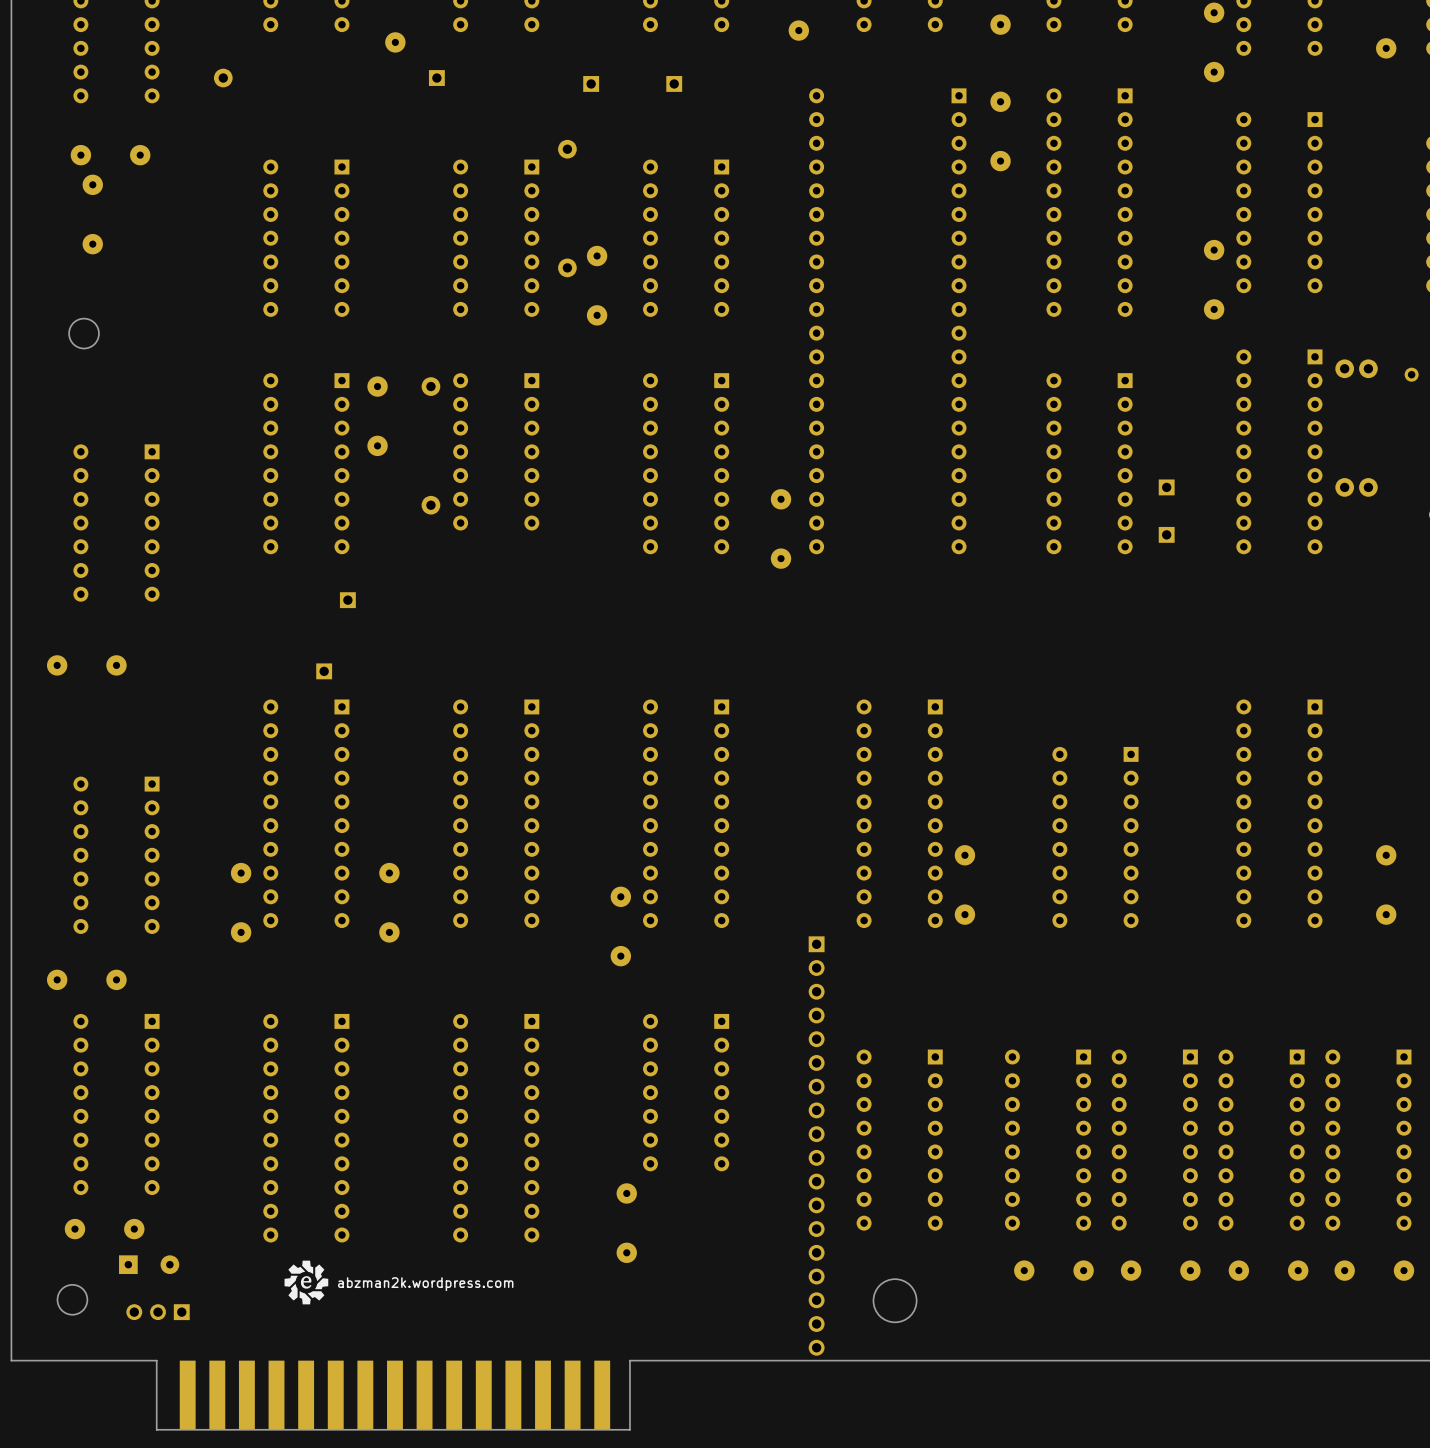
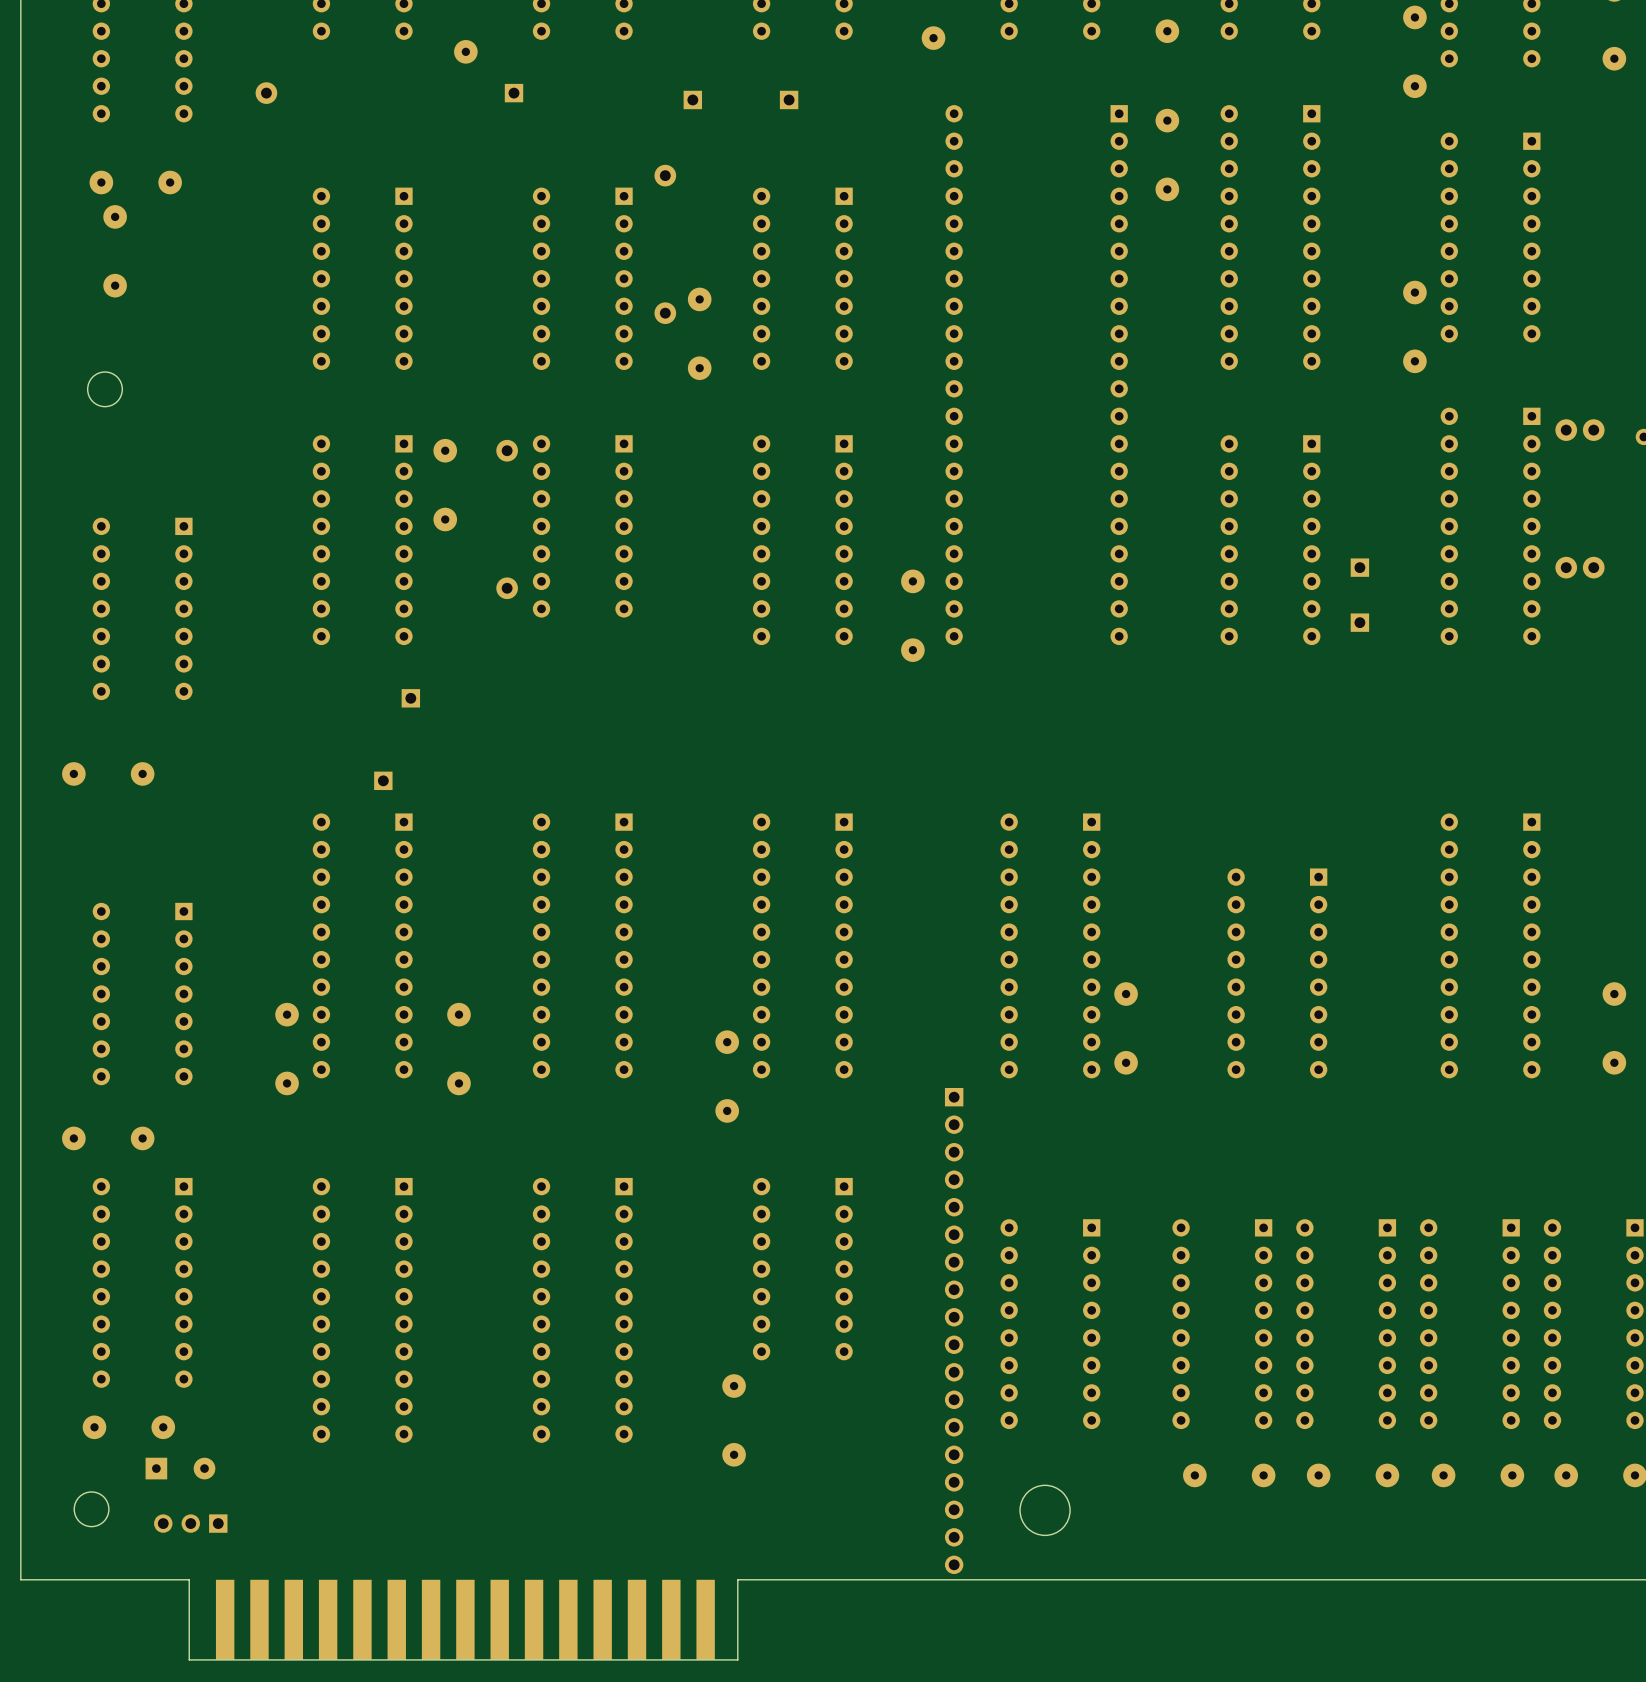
drawing: [284, 1260, 329, 1305] -> none
text: abzman2k.wordpress.com (425, 1284) -> none

